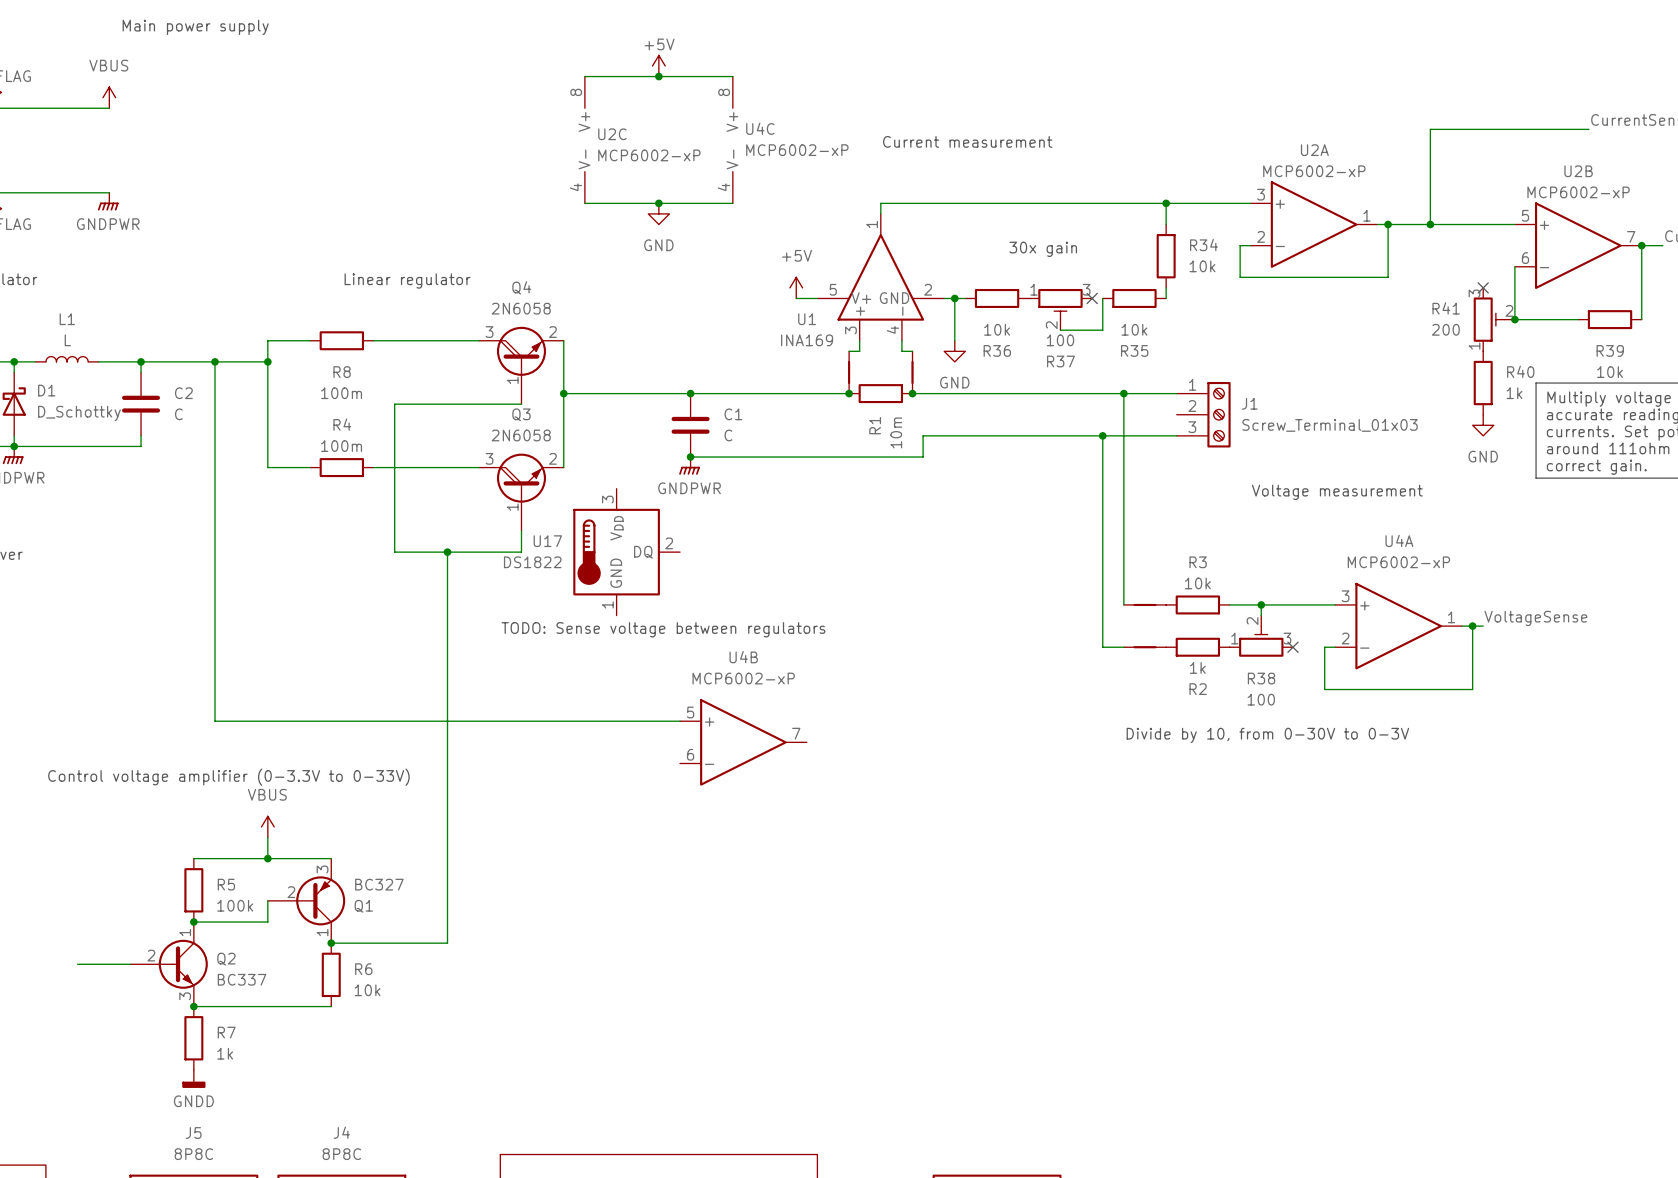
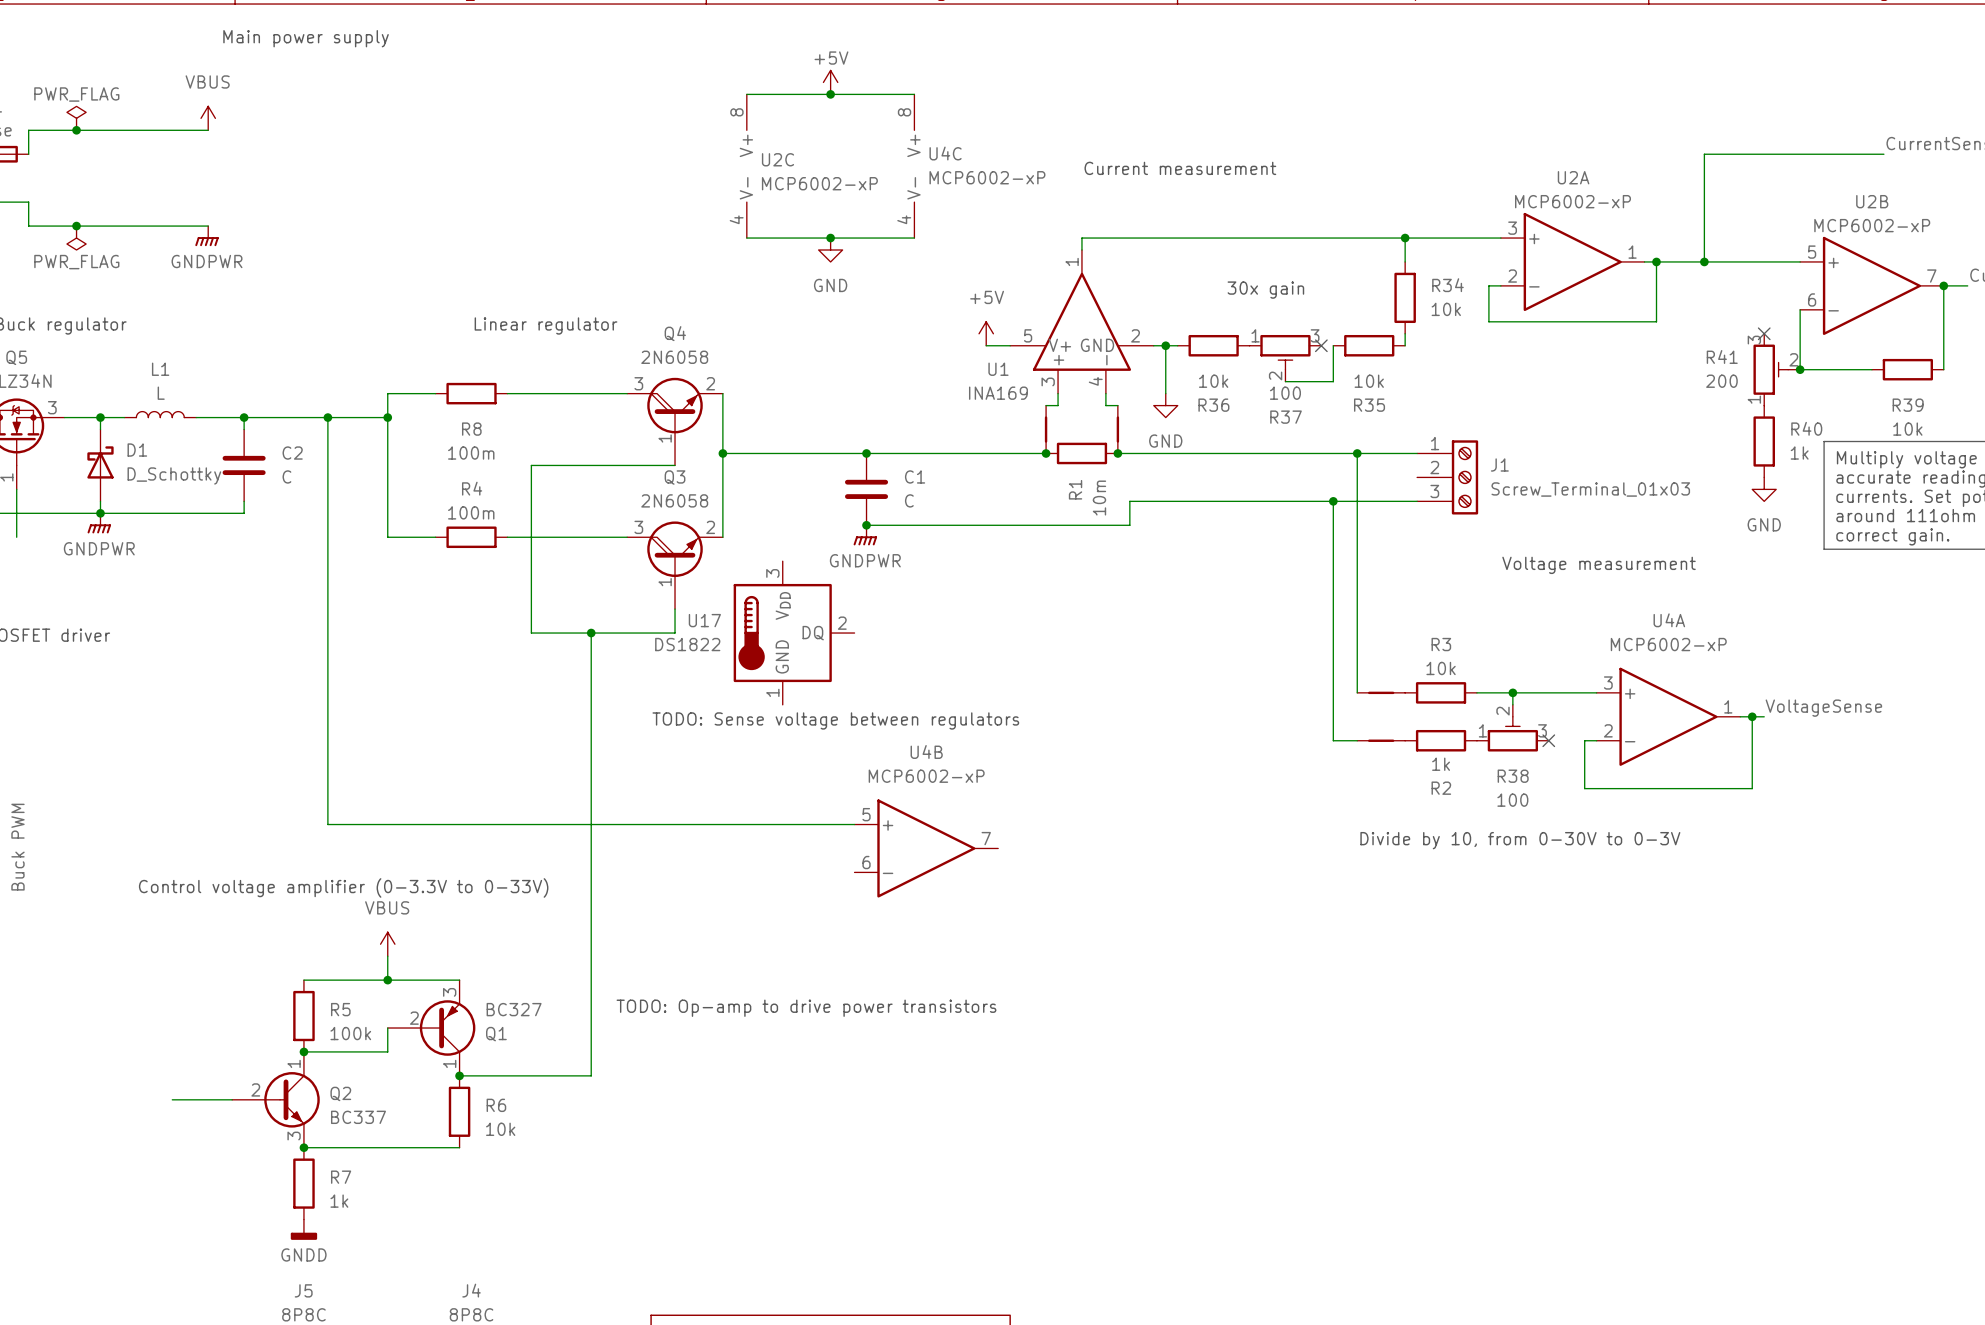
text: none -> TODO: Op-amp to drive power transistors (806, 1008)

